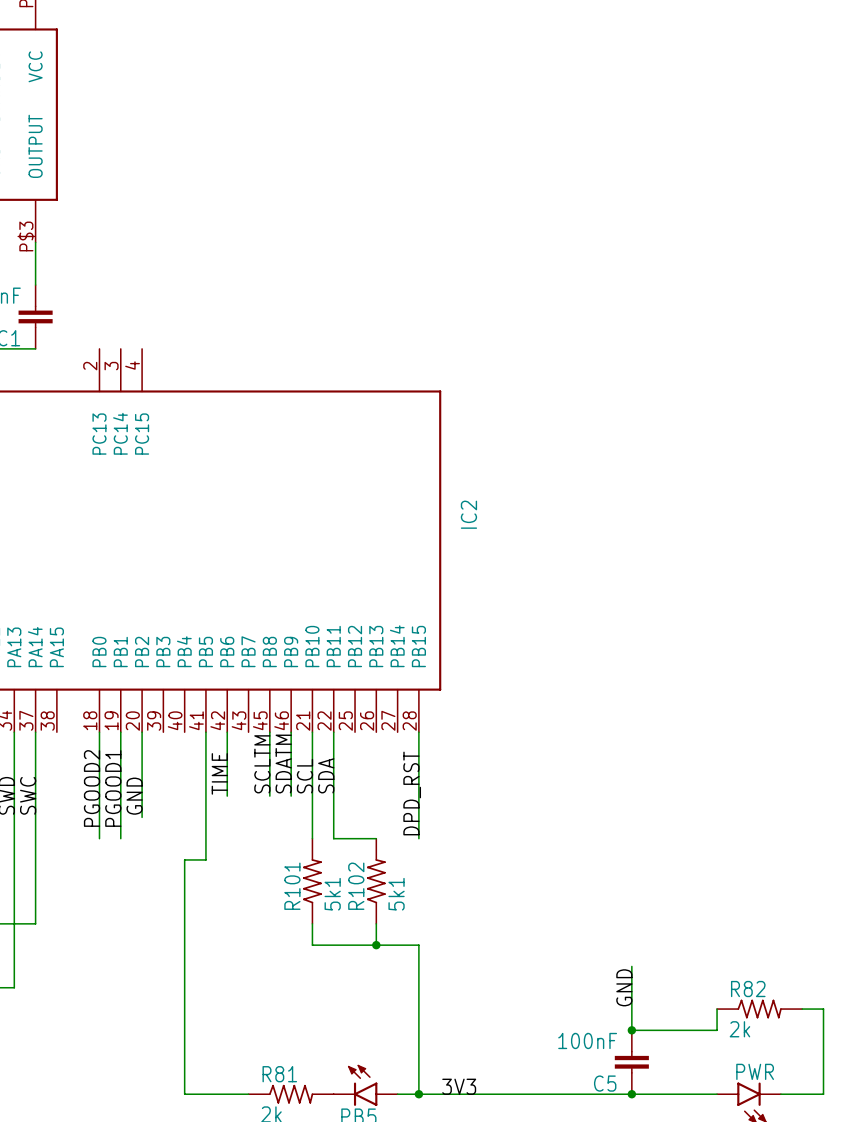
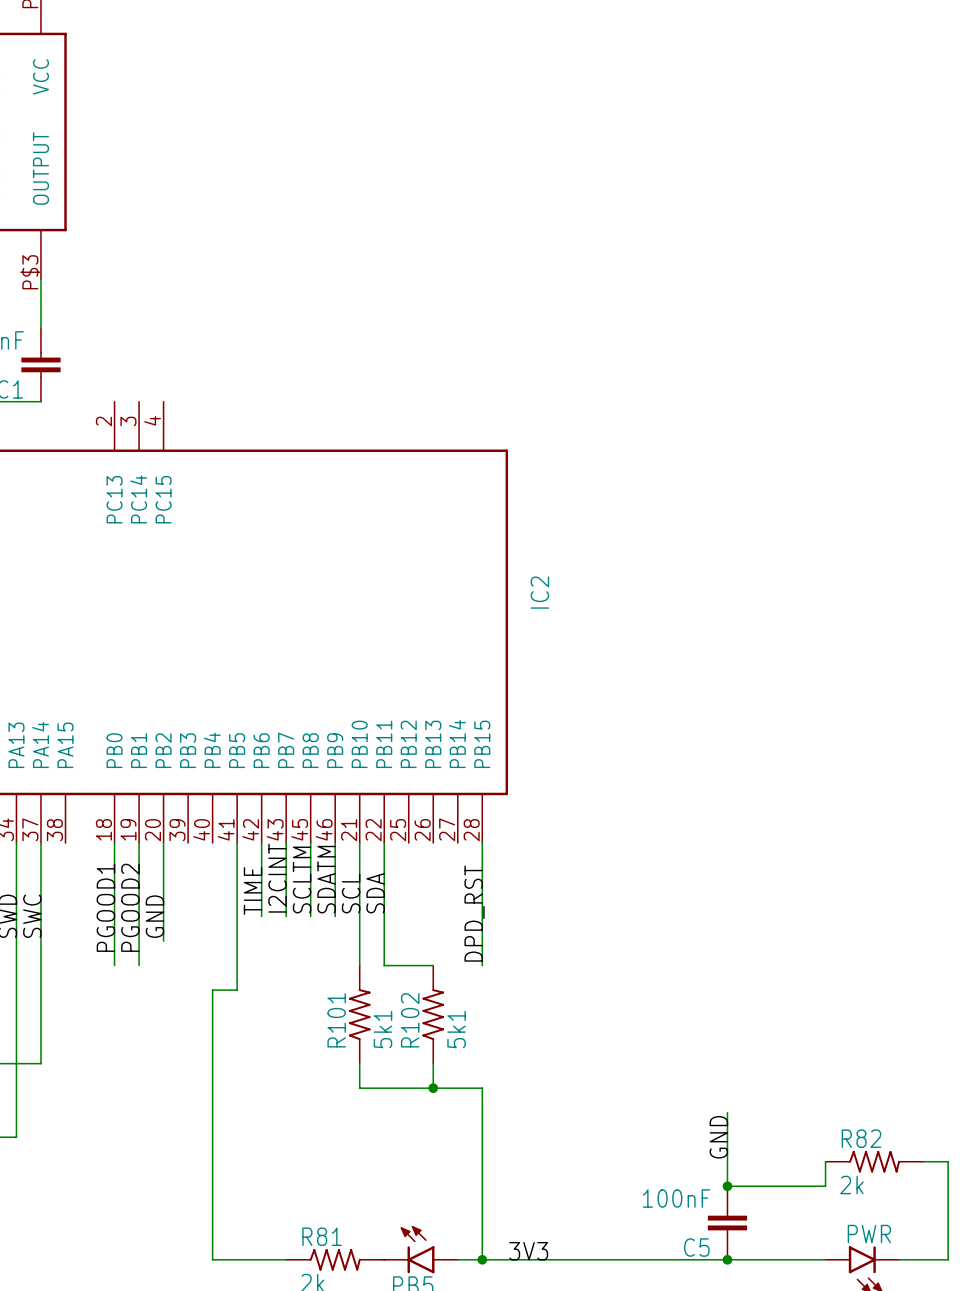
wire: none -> (286, 843) (286, 916)
label: none -> I2CINT (277, 878)
label: PGOOD2 (92, 788) -> PGOOD1 (105, 907)
label: PGOOD1 (113, 788) -> PGOOD2 (130, 907)

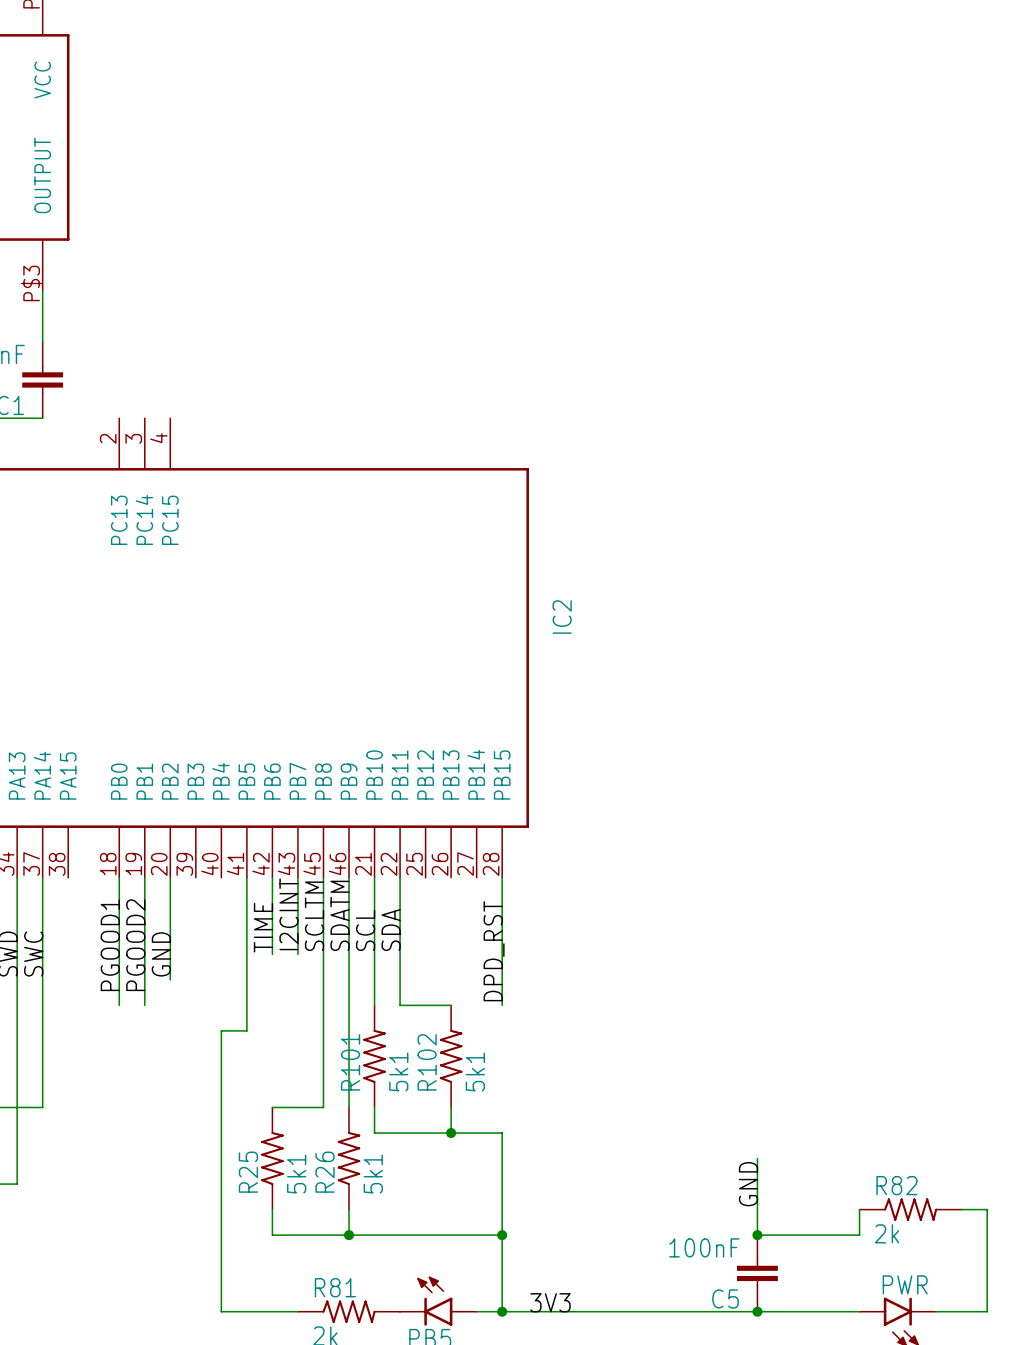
wire: none -> (323, 954) (323, 1107) (272, 1107)
wire: none -> (349, 954) (349, 1107)
R25: none -> 5k1 (272, 1158)
R26: none -> 5k1 (349, 1158)
wire: none -> (272, 1209) (272, 1235) (502, 1235)
wire: none -> (349, 1209) (349, 1235)
junction: none -> (349, 1235)
junction: none -> (502, 1235)

